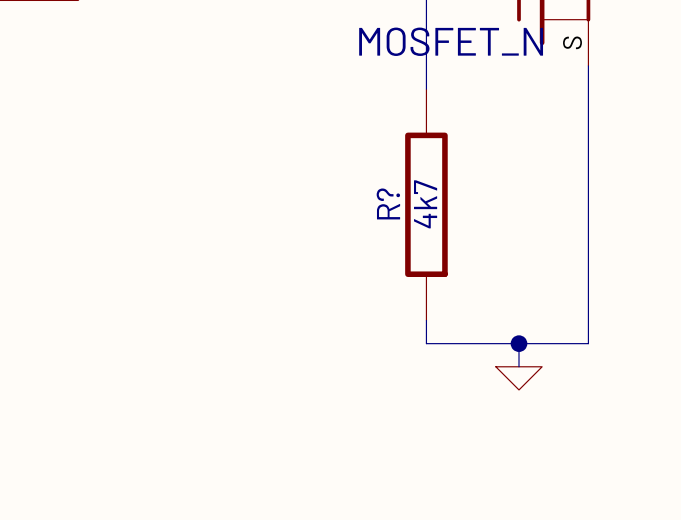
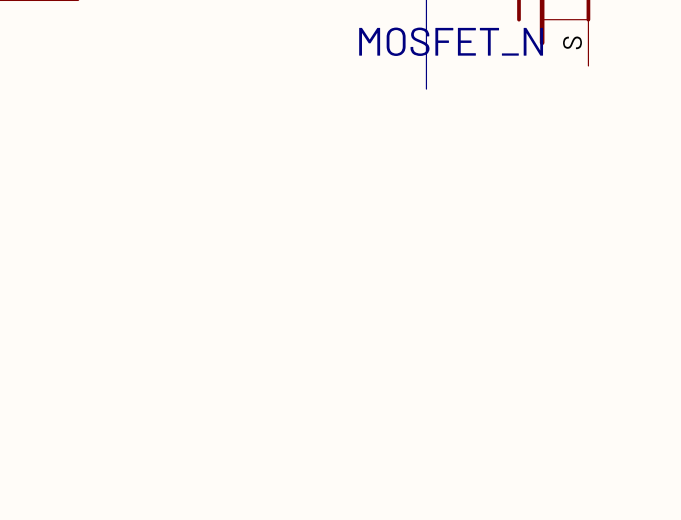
wire: (588, 65) (588, 343) (426, 343) (426, 320) -> none
R?: 4k7 (426, 204) -> none
wire: (518, 343) (518, 366) -> none
junction: (518, 343) -> none
power symbol: (518, 378) -> none

